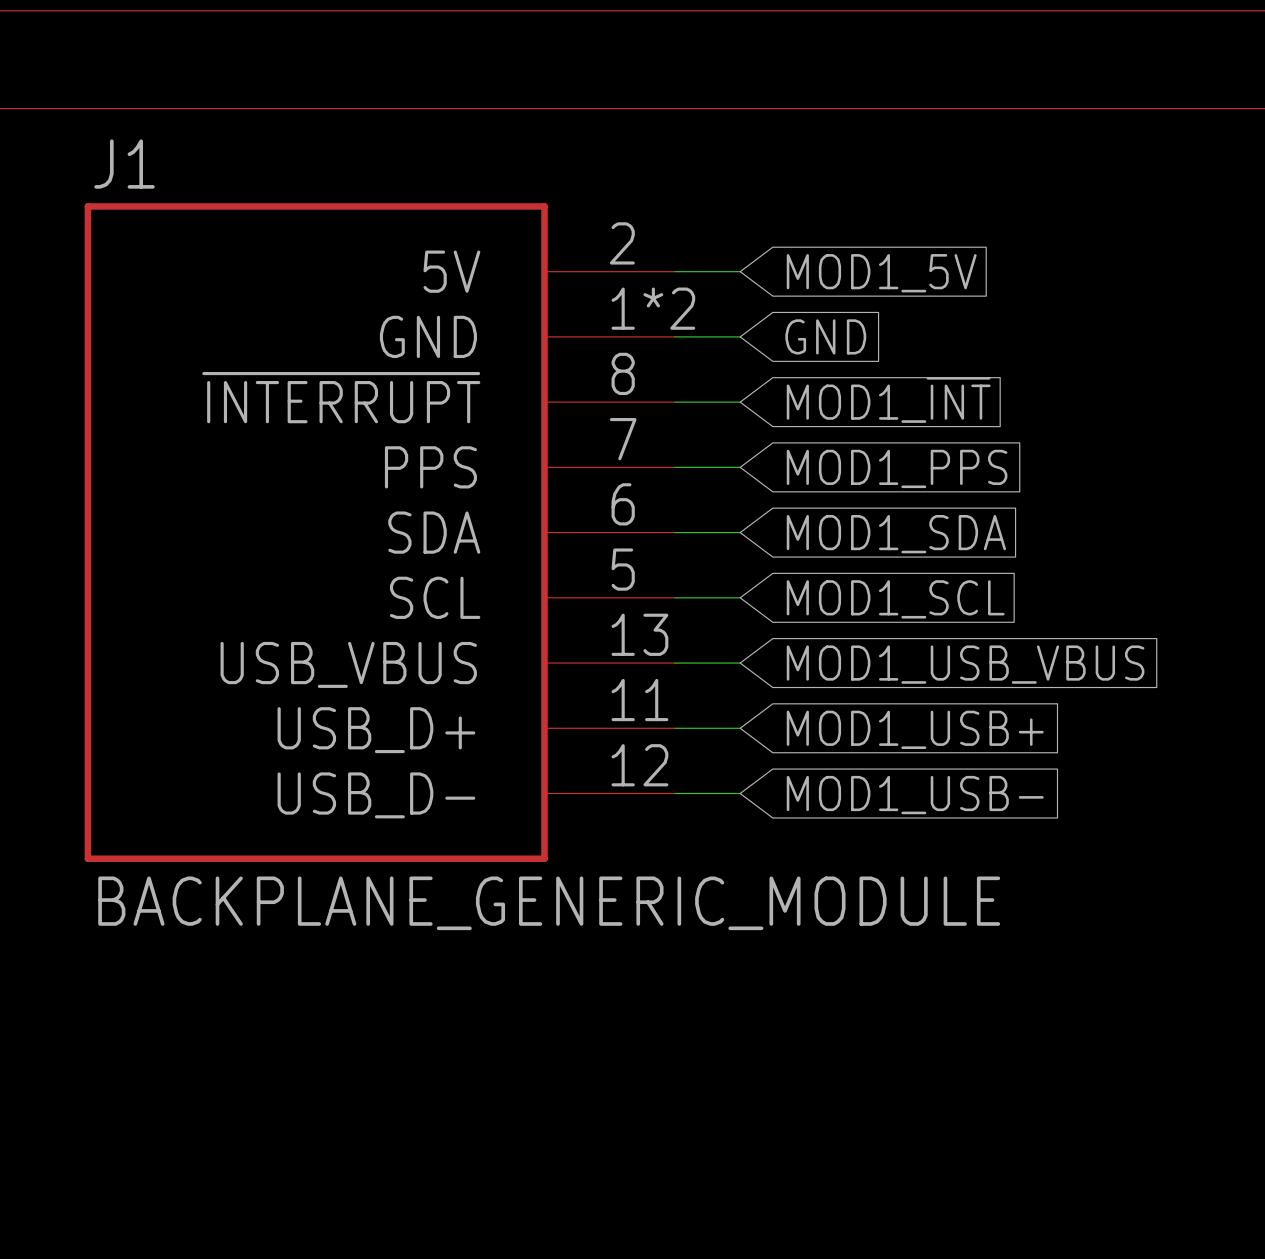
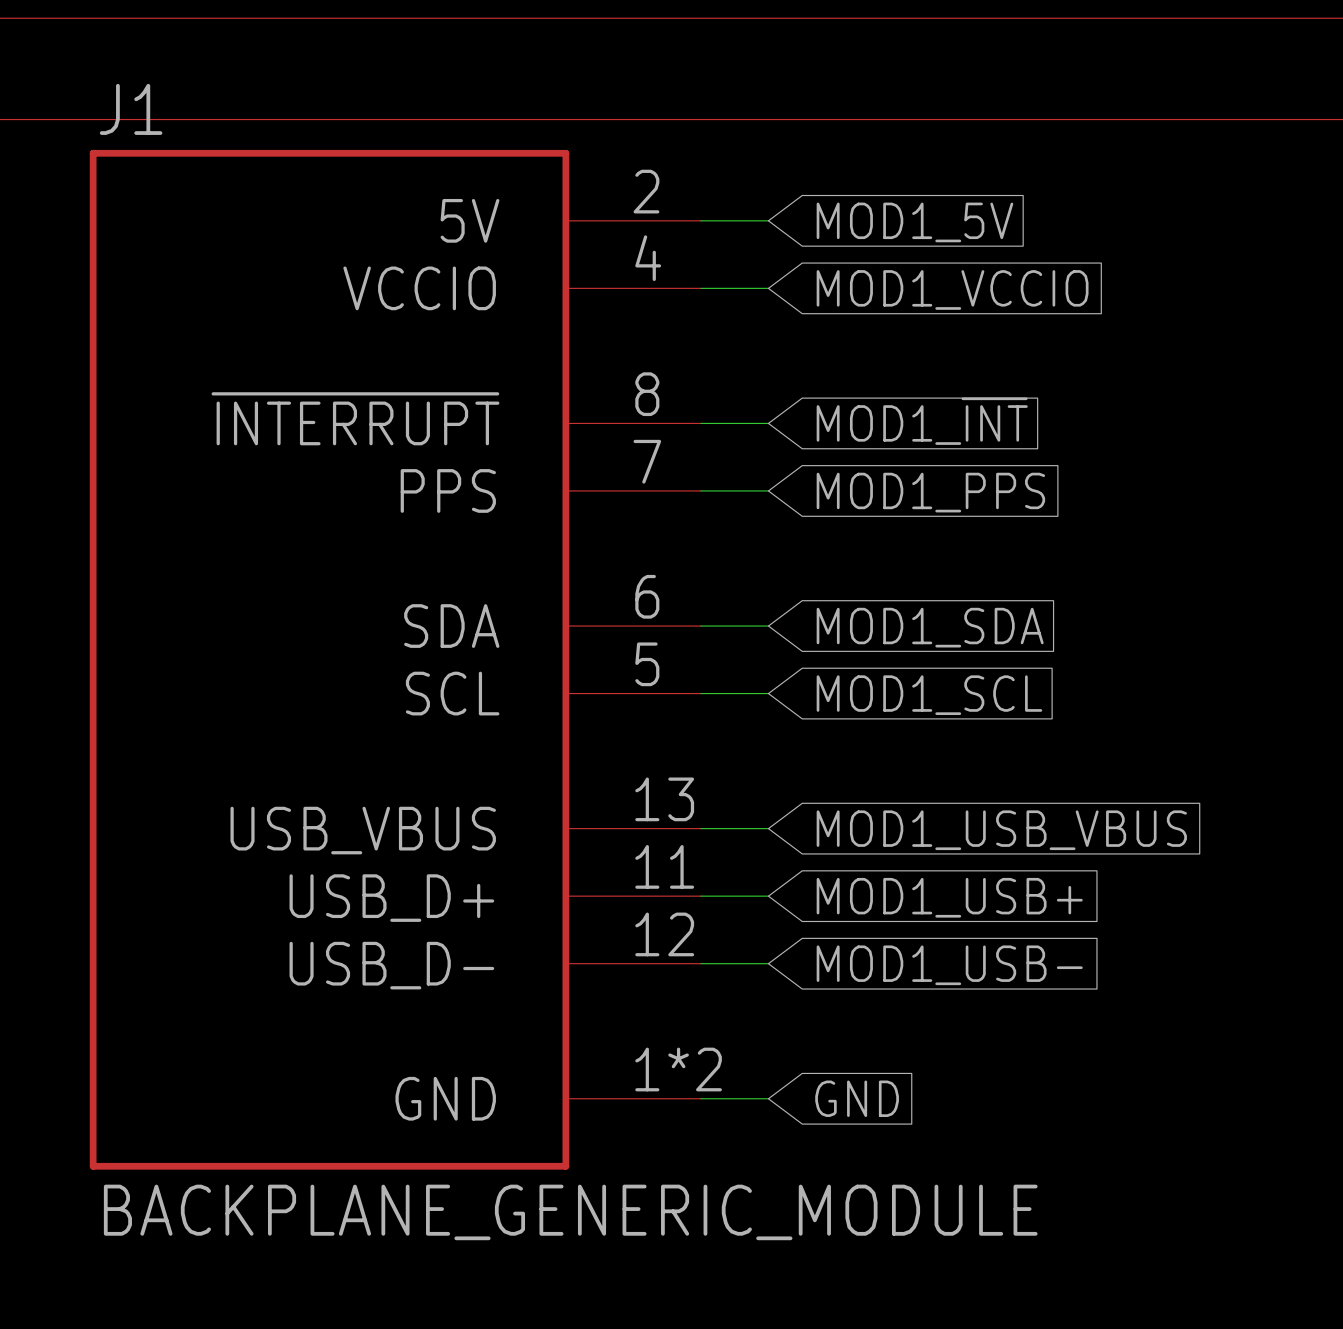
J1 name position: J1 (124, 164) -> J1 (131, 109)
J1 symbol: [84, 203, 675, 863] -> [89, 149, 701, 1170]
global label: none -> MOD1_5V (914, 222)
global label: MOD1_5V (881, 273) -> MOD1_VCCIO (952, 289)
wire: (674, 336) (740, 336) -> (700, 220) (768, 220)
global label: GND (825, 336) -> none
wire: (674, 532) (740, 532) -> (700, 896) (768, 896)
global label: MOD1_SDA (896, 534) -> none
global label: MOD1_SCL (895, 599) -> MOD1_SDA (930, 627)
global label: MOD1_USB_VBUS (965, 664) -> MOD1_SCL (929, 695)
wire: (674, 728) (740, 728) -> (700, 1098) (768, 1098)
global label position: MOD1_USB+ (915, 729) -> MOD1_USB+ (949, 897)
global label: MOD1_USB- (915, 795) -> MOD1_USB_VBUS (1001, 830)
J1 value position: BACKPLANE_GENERIC_MODULE (549, 903) -> BACKPLANE_GENERIC_MODULE (570, 1212)
wire: none -> (700, 963) (768, 963)
global label: none -> MOD1_USB- (949, 965)
global label: none -> GND (857, 1098)

